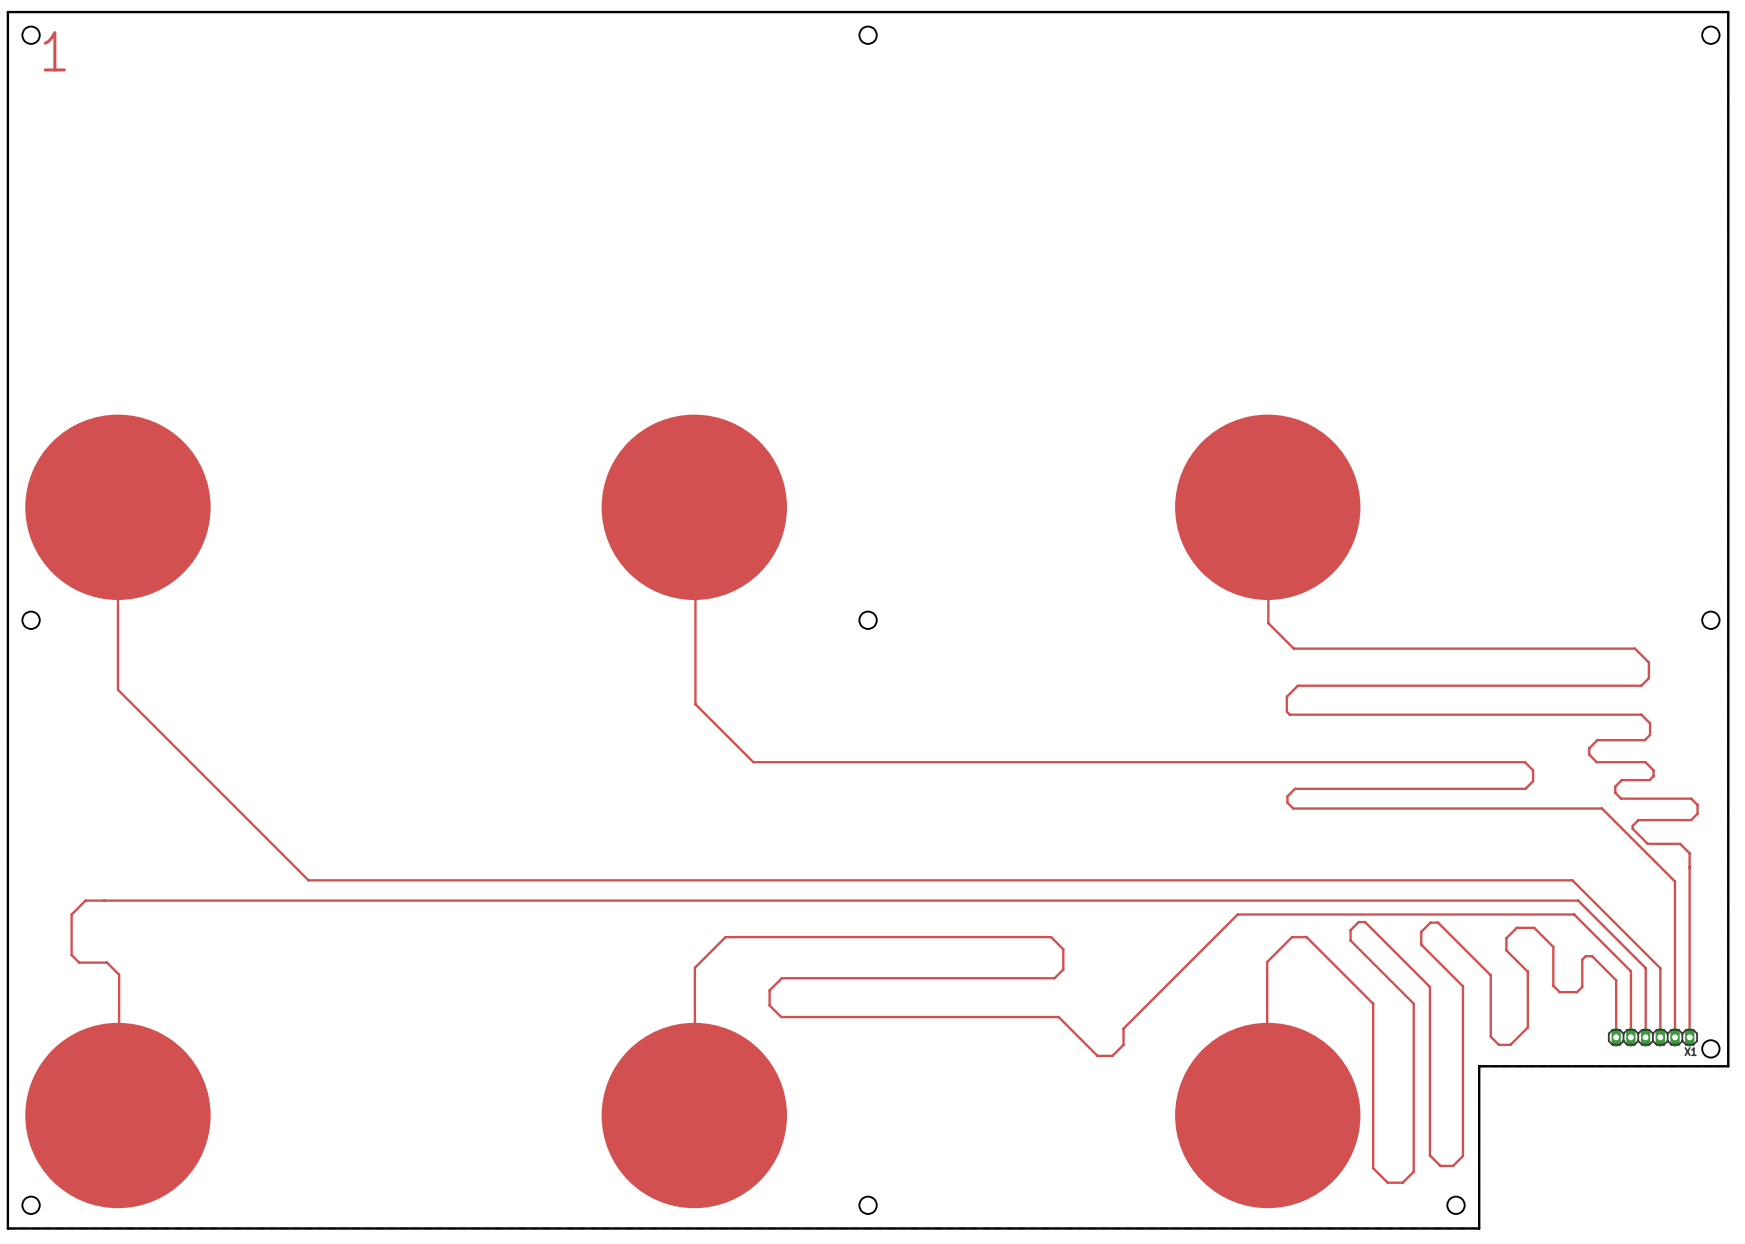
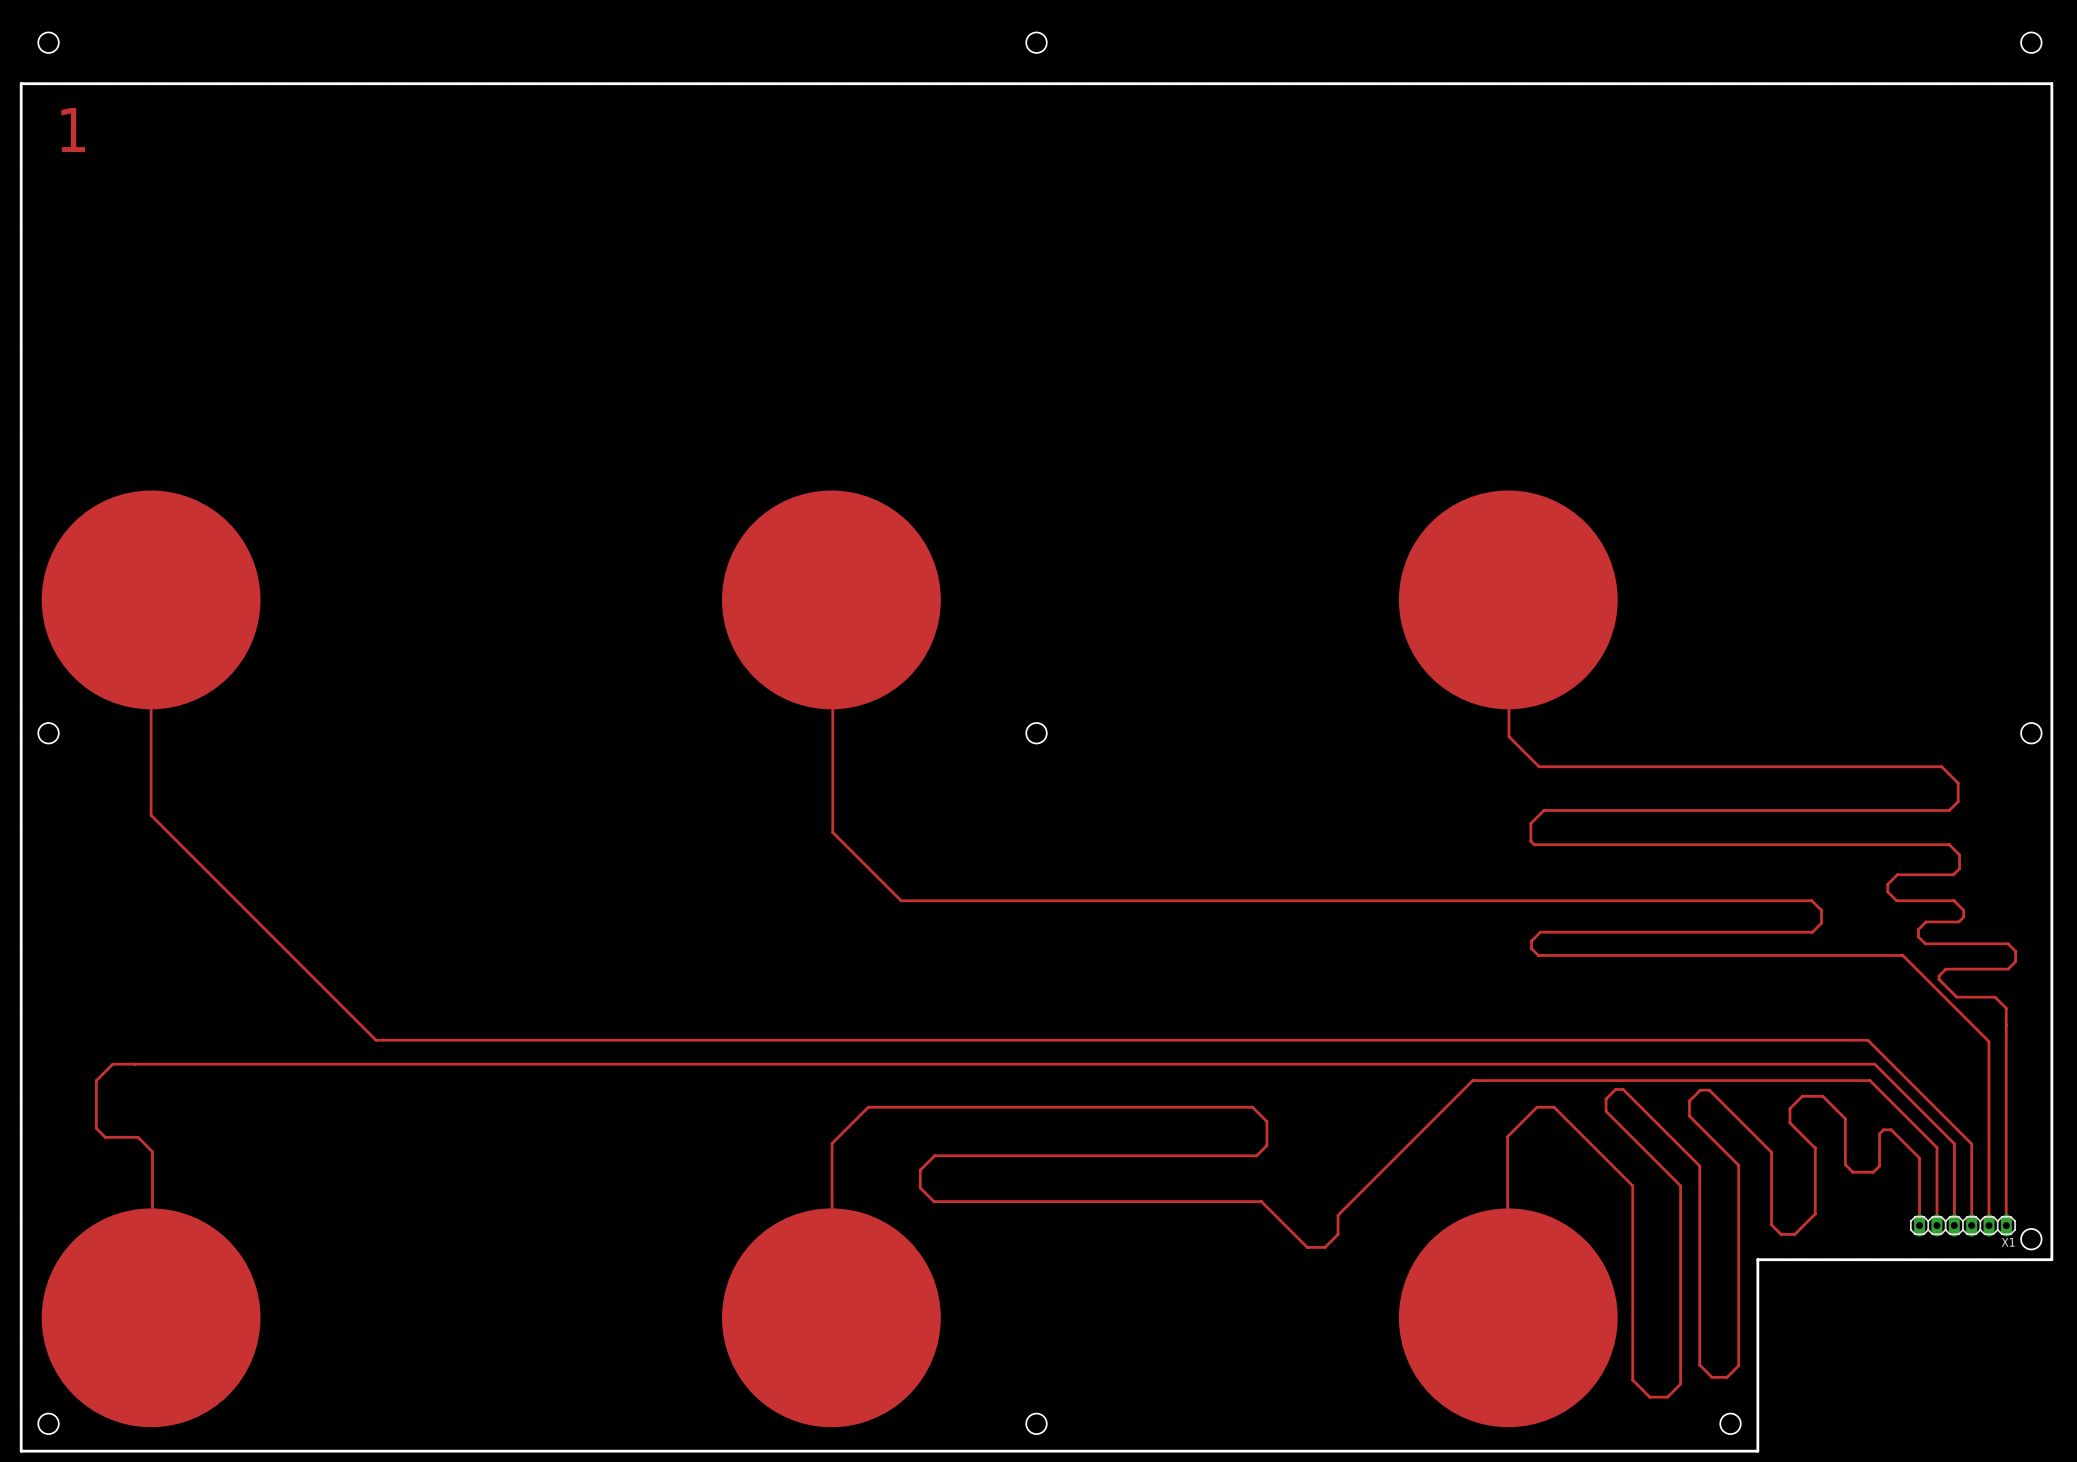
text position: 1 (54, 51) -> 1 (73, 130)
board edge: (7, 69) (7, 12) (1728, 12) (1728, 69) -> (21, 83) (2051, 83)

